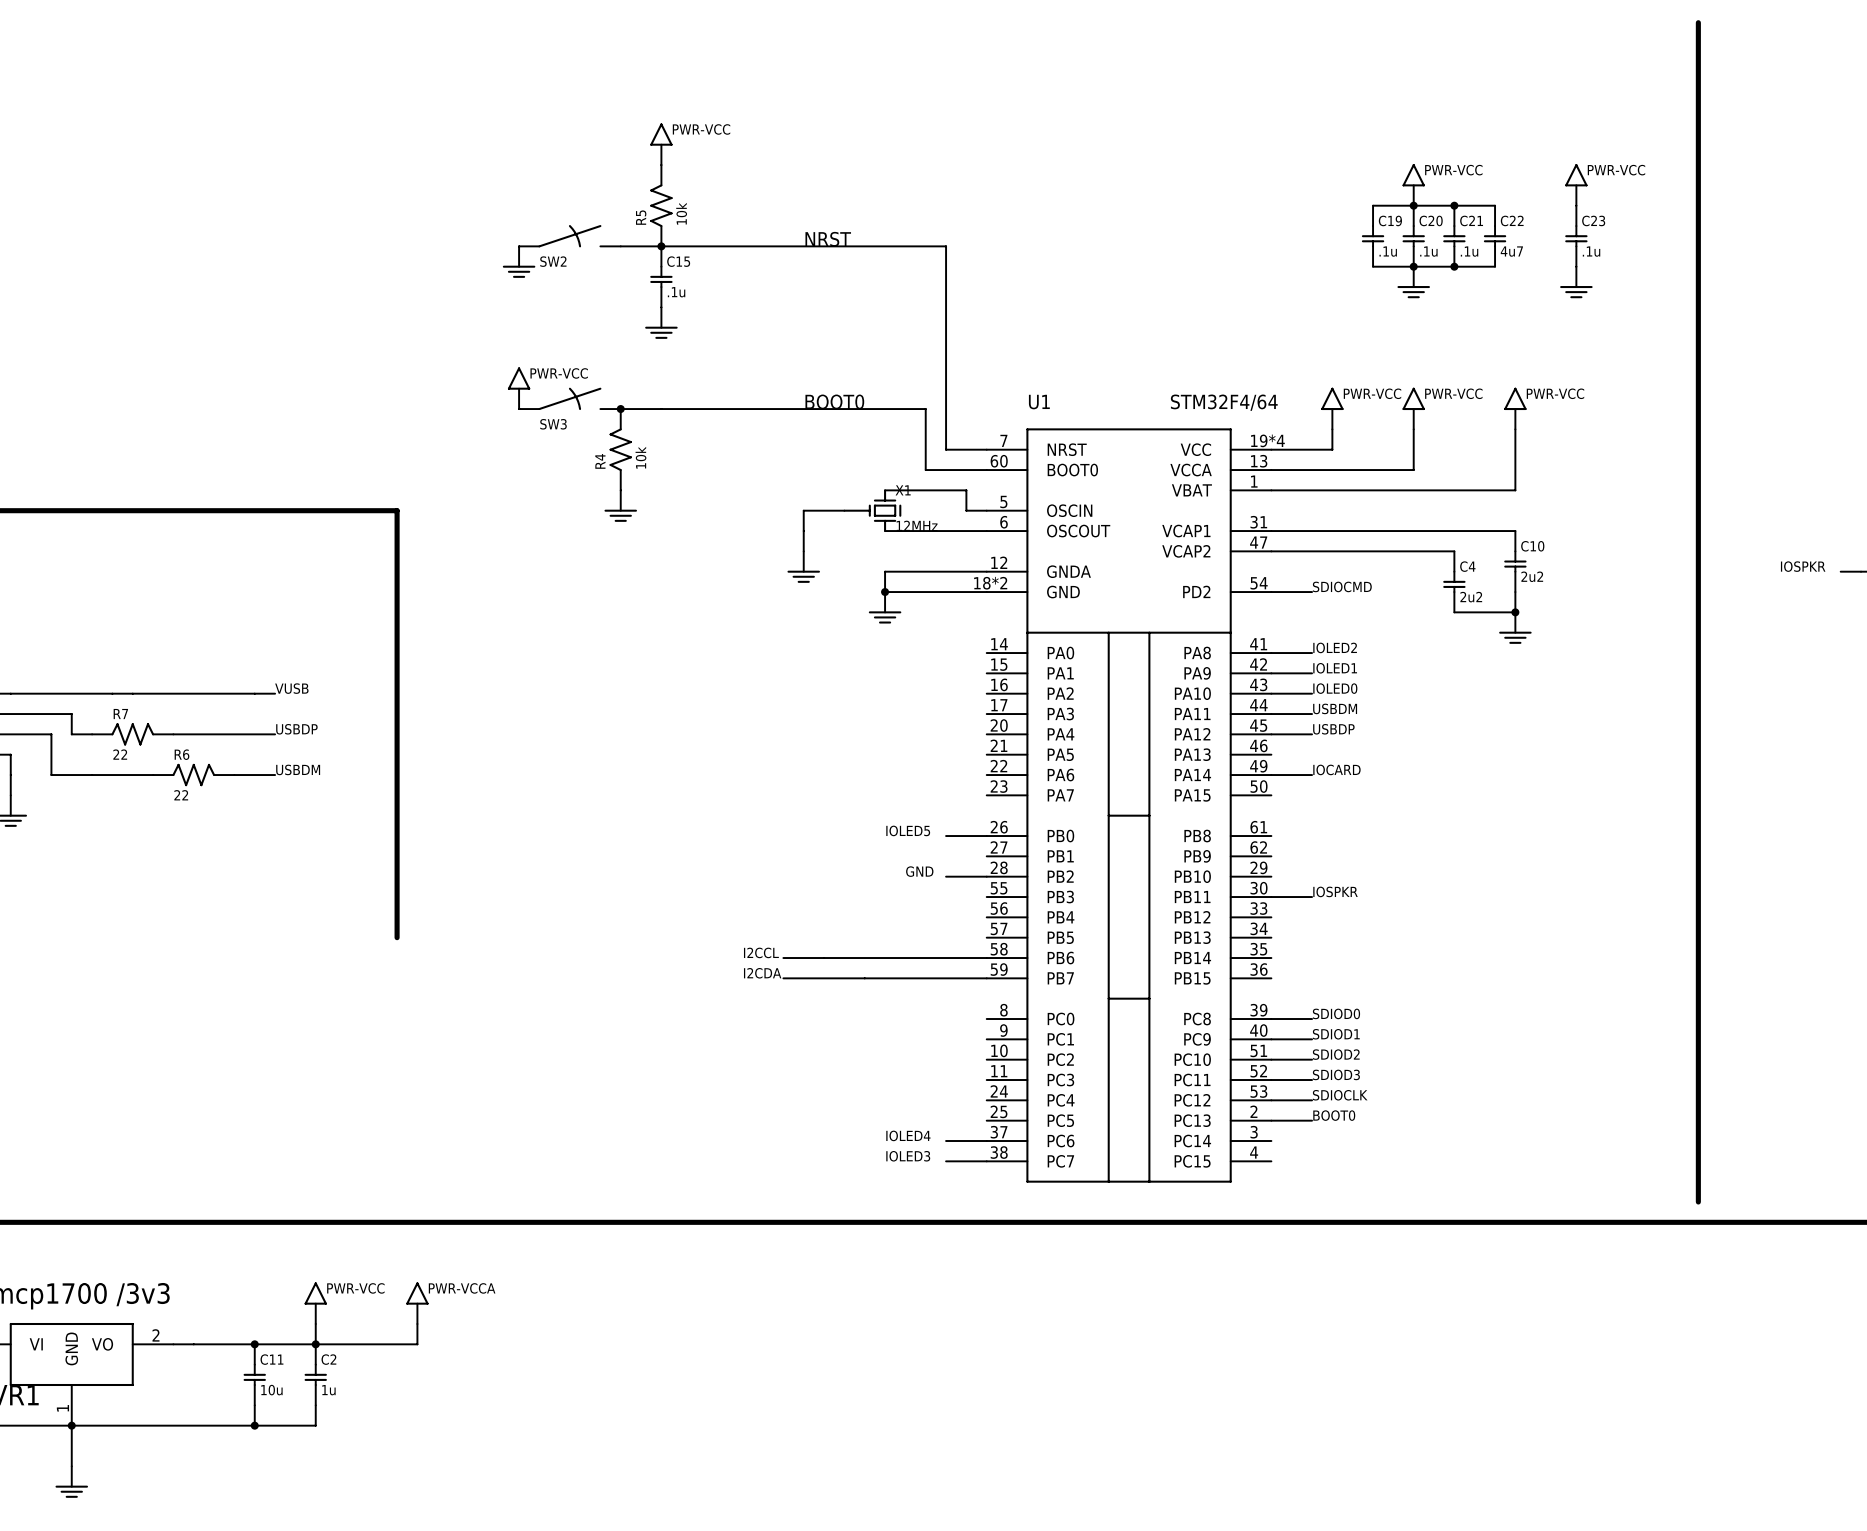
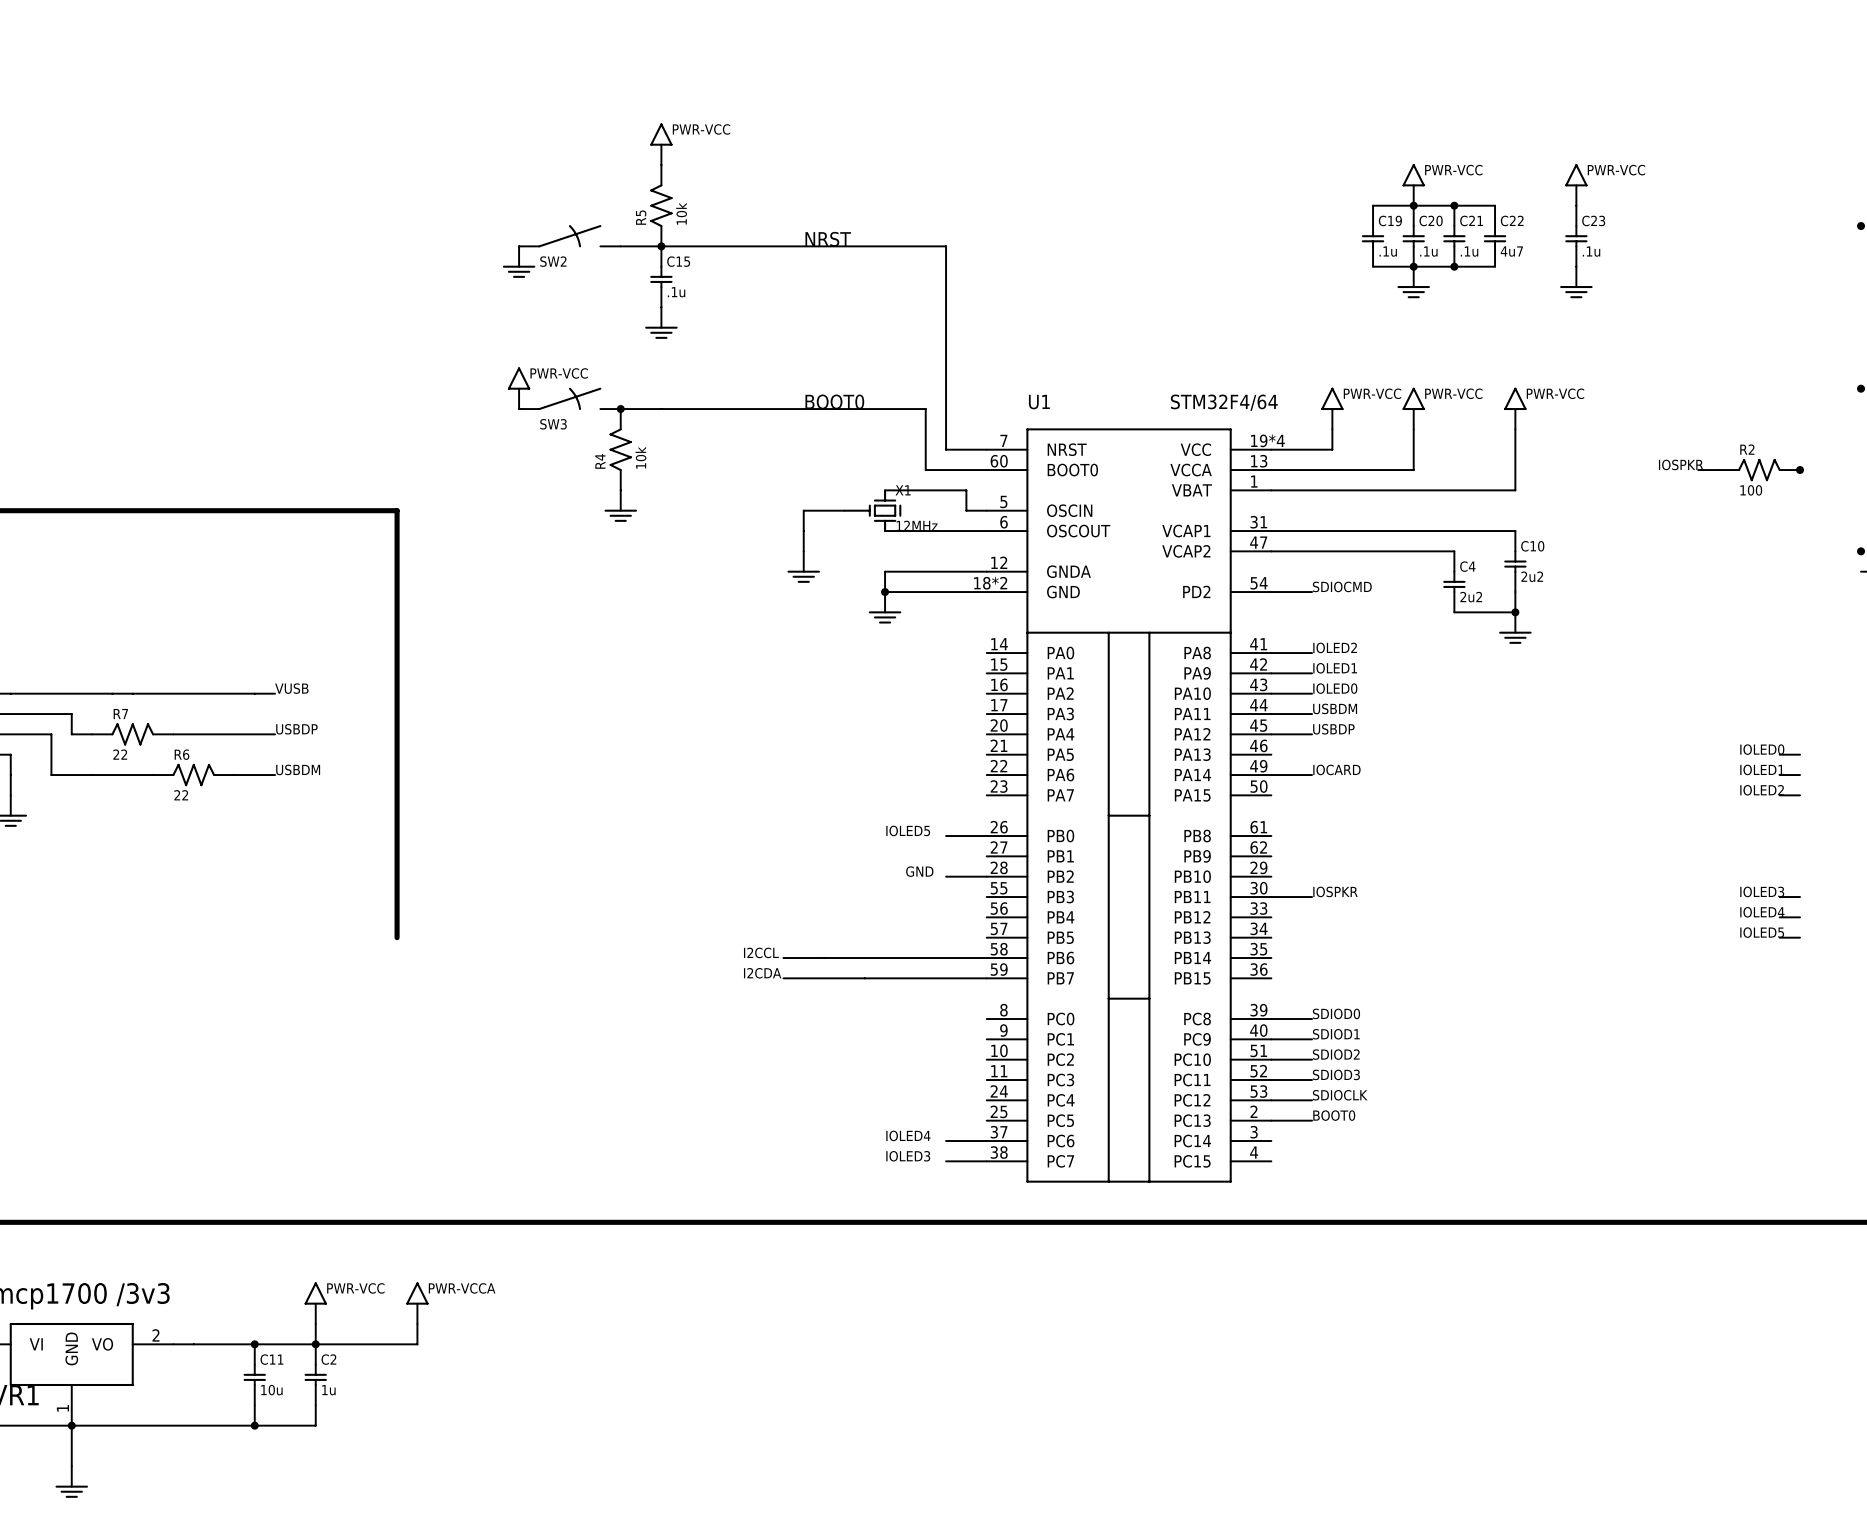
line: (1698, 22) (1698, 1202) -> none
junction: none -> (1861, 226)
junction: none -> (1861, 388)
R2: none -> 100 (1759, 470)
junction: none -> (1800, 470)
junction: none -> (1861, 551)
label position: IOSPKR (1803, 566) -> IOSPKR (1681, 464)
wire: (1840, 571) (1861, 571) -> (1698, 470) (1718, 470)
label: none -> IOLED0 (1762, 749)
wire: none -> (1779, 754) (1800, 754)
label: none -> IOLED1 (1762, 769)
wire: none -> (1779, 775) (1800, 775)
label: none -> IOLED2 (1762, 790)
wire: none -> (1779, 795) (1800, 795)
label: none -> IOLED3 (1762, 891)
wire: none -> (1779, 897) (1800, 897)
label: none -> IOLED4 (1762, 912)
wire: none -> (1779, 917) (1800, 917)
label: none -> IOLED5 (1762, 932)
wire: none -> (1779, 937) (1800, 937)

